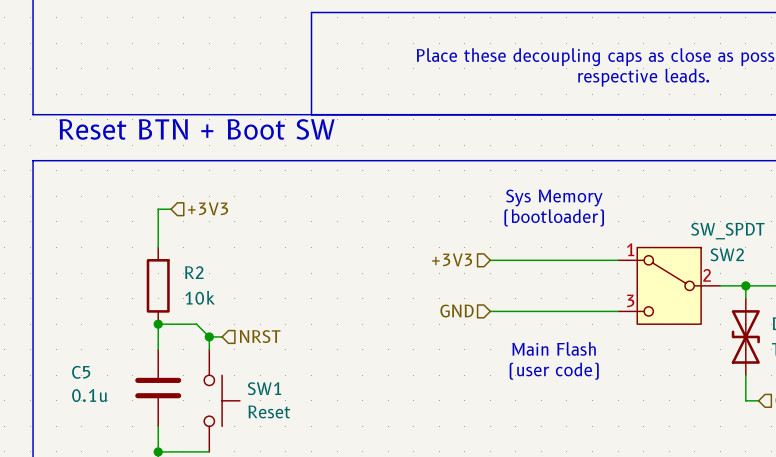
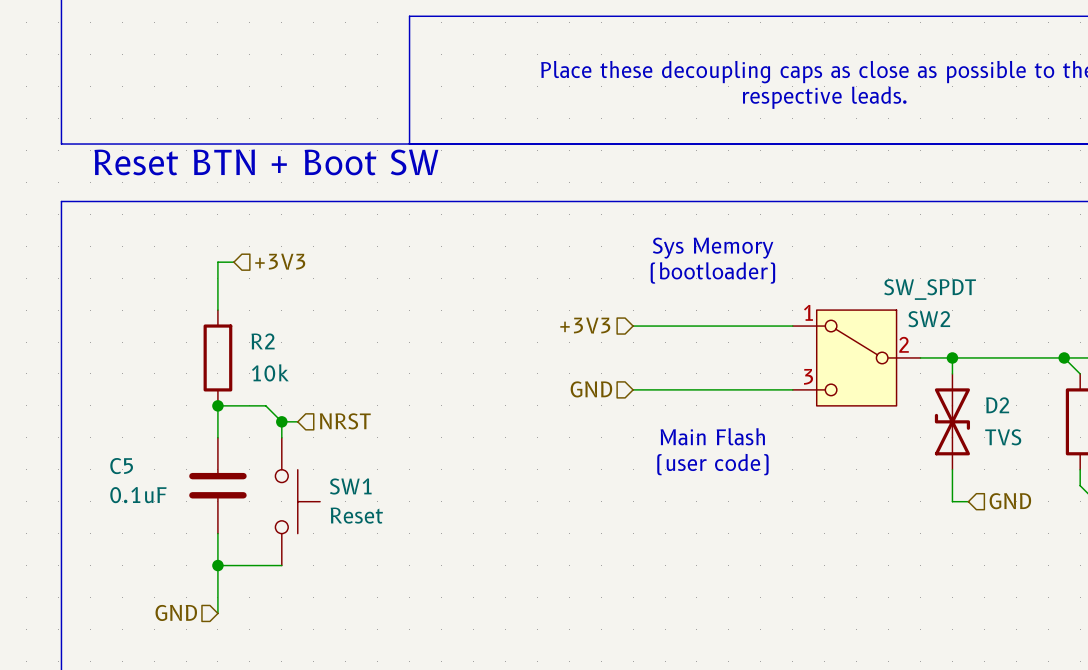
C5 value: 0.1u (89, 395) -> 0.1uF (138, 495)

